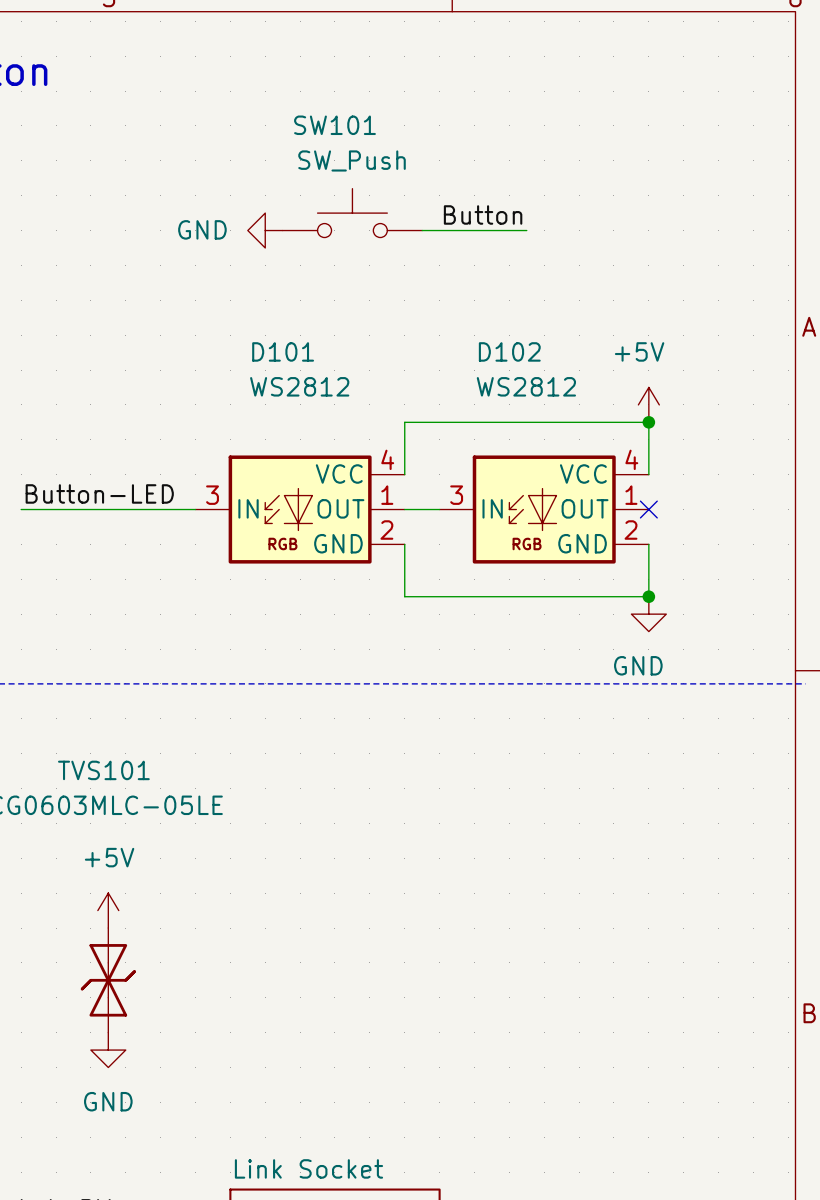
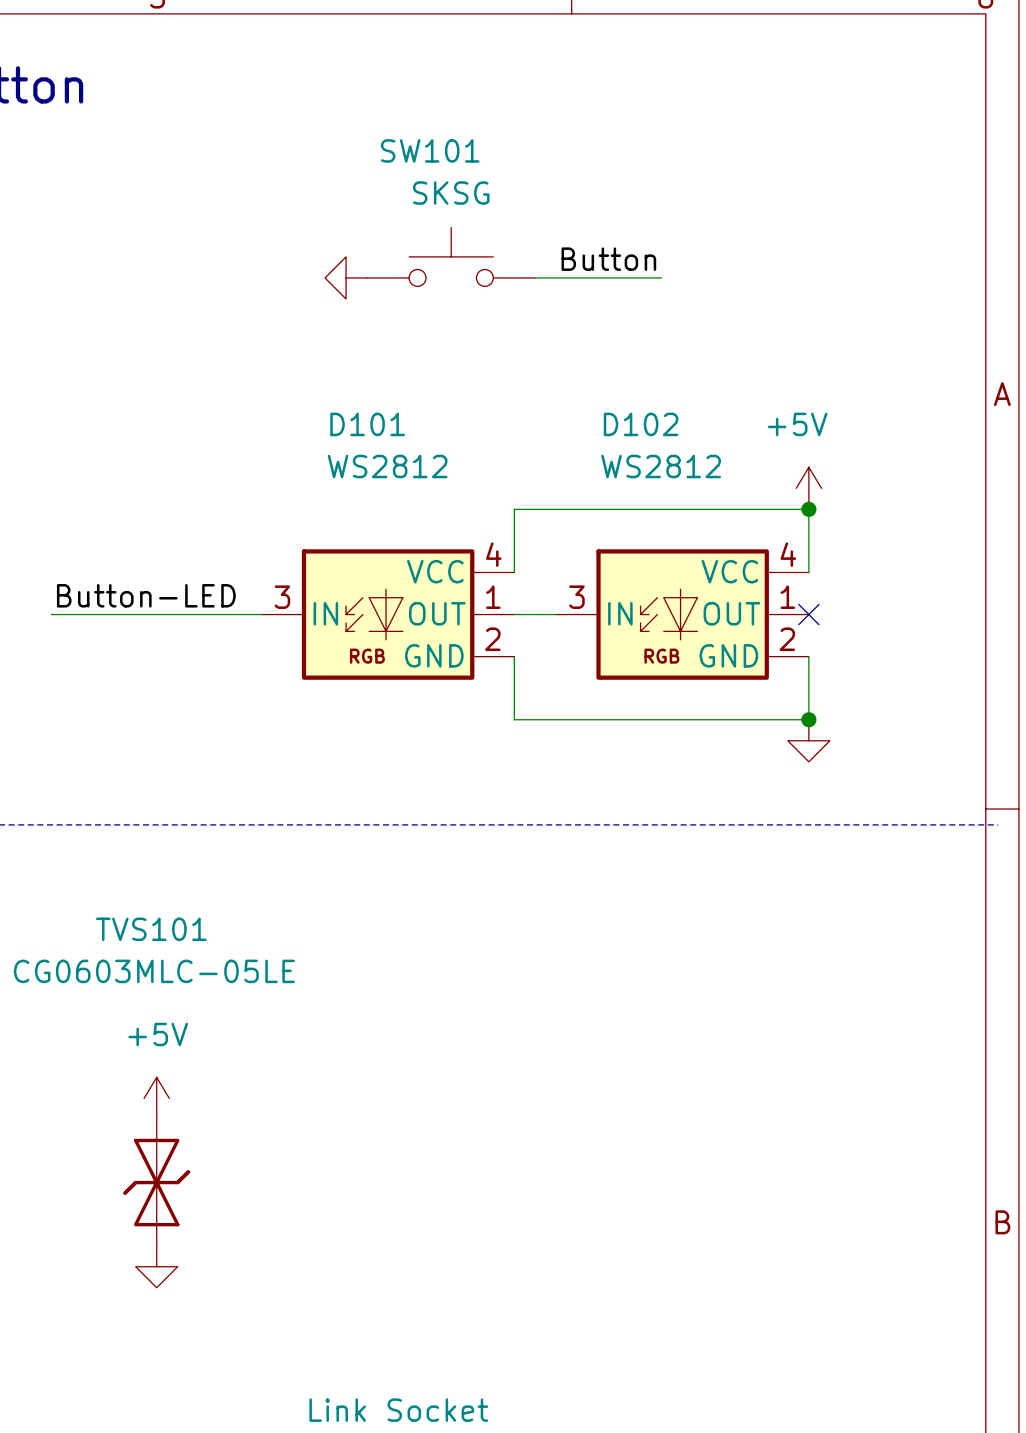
SW101 value: SW_Push (352, 160) -> SKSG (451, 193)
power symbol text: GND (202, 229) -> none
power symbol text: GND (638, 665) -> none
power symbol text: GND (108, 1101) -> none

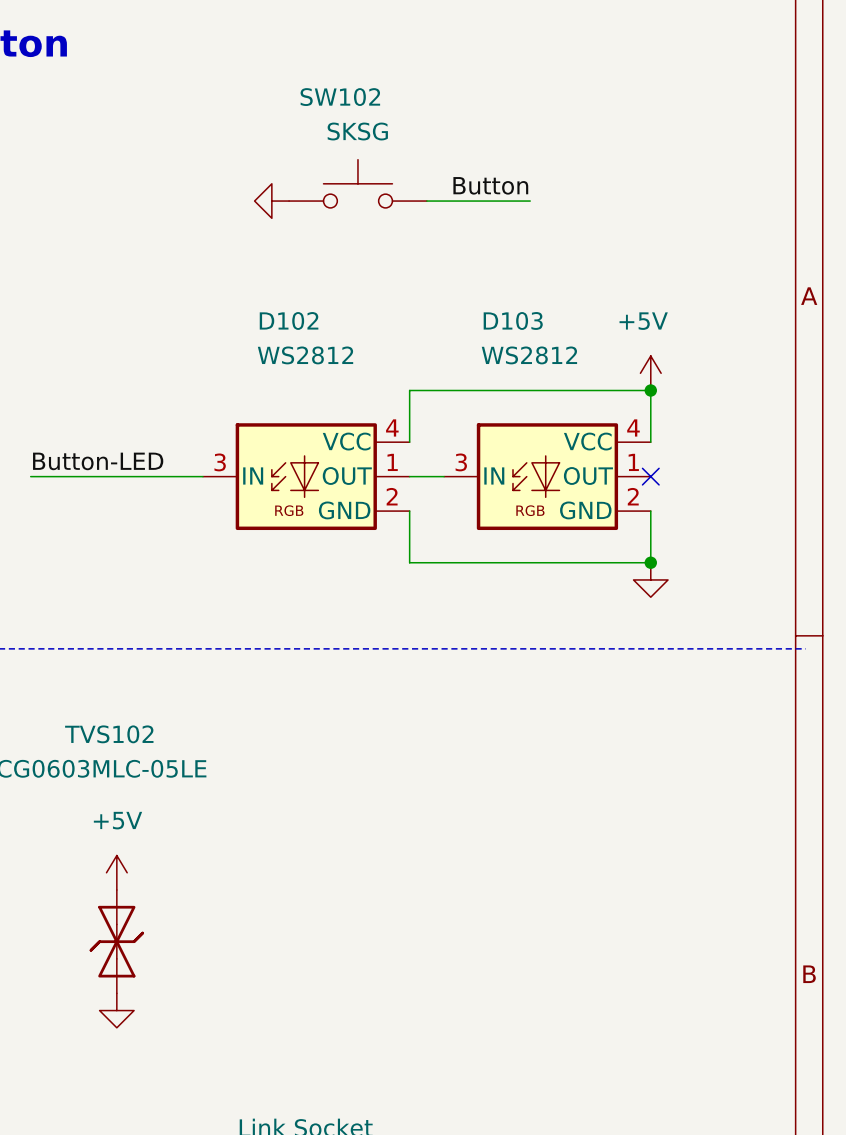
SW101 name: SW101 (430, 150) -> SW102 (340, 97)
D101 name: D101 (367, 424) -> D102 (289, 320)
D102 name: D102 (641, 424) -> D103 (513, 320)
TVS101 name: TVS101 (151, 929) -> TVS102 (109, 734)

